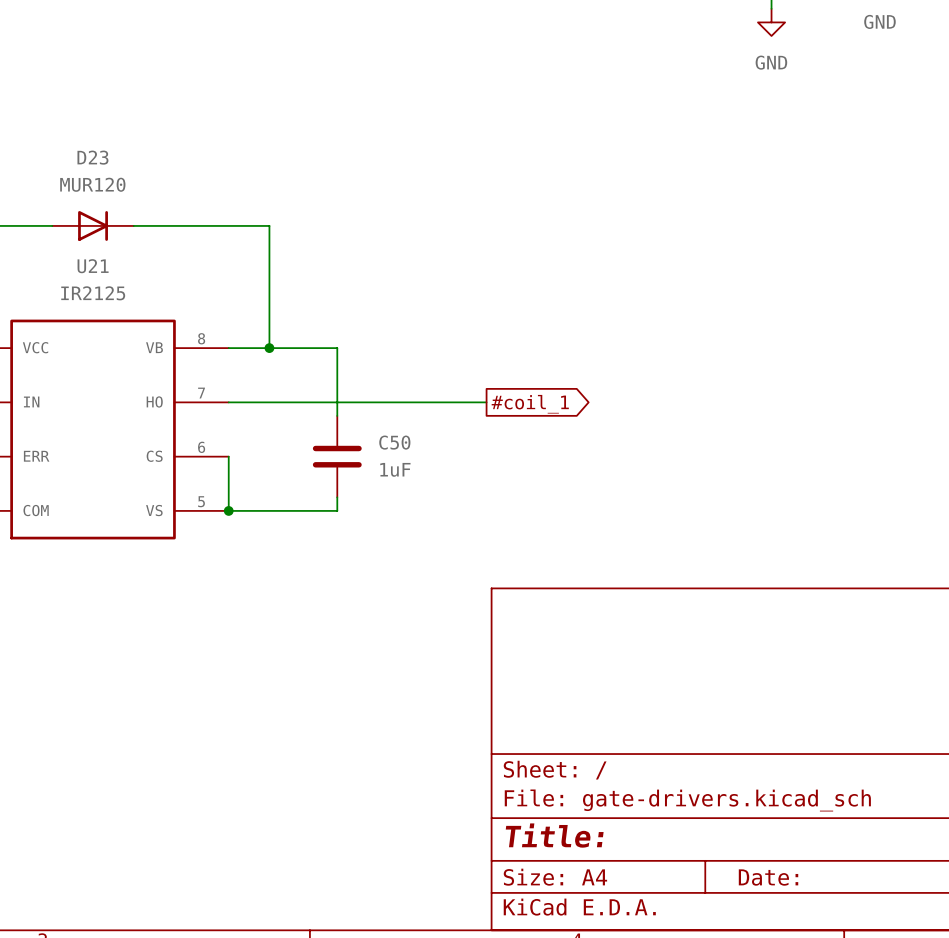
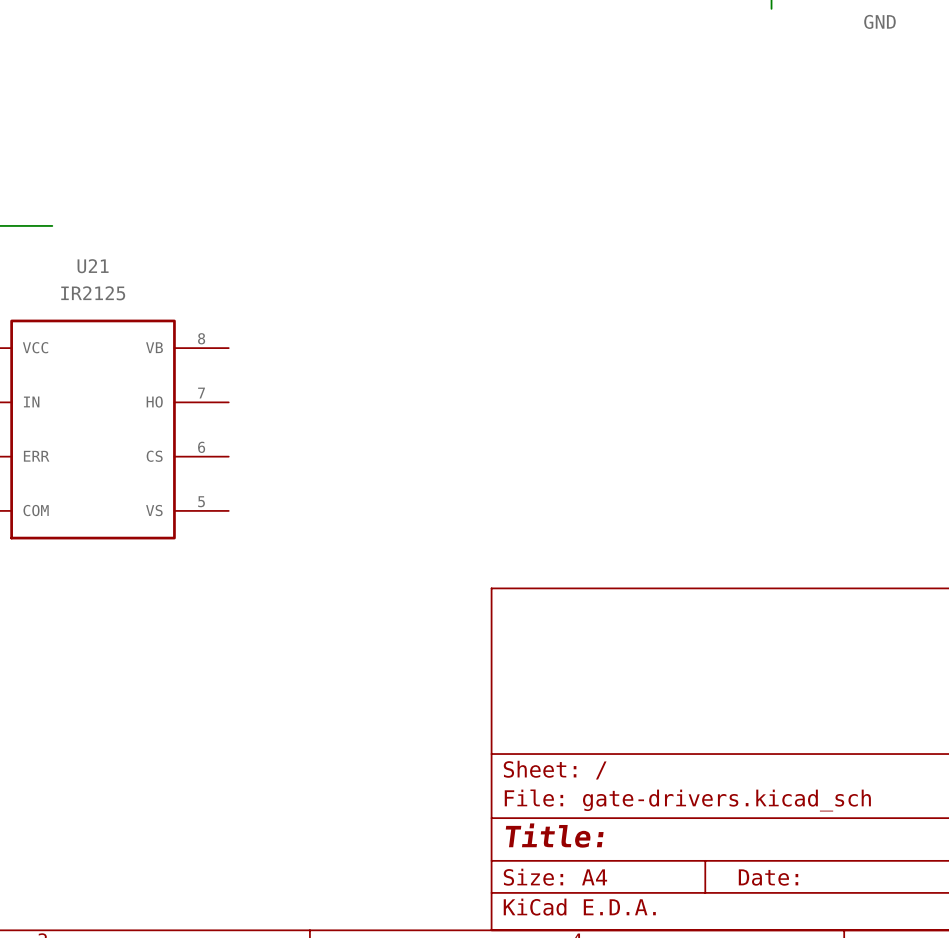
power symbol: GND (771, 22) -> none
D23: MUR120 (93, 225) -> none
wire: (133, 225) (269, 225) (269, 348) -> none
wire: (228, 348) (337, 348) (337, 415) -> none
junction: (269, 348) -> none
wire: (228, 402) (486, 402) -> none
global label: #coil_1 (530, 404) -> none
wire: (228, 456) (228, 510) (337, 510) (337, 497) -> none
C50: 1uF (337, 456) -> none
junction: (228, 510) -> none

